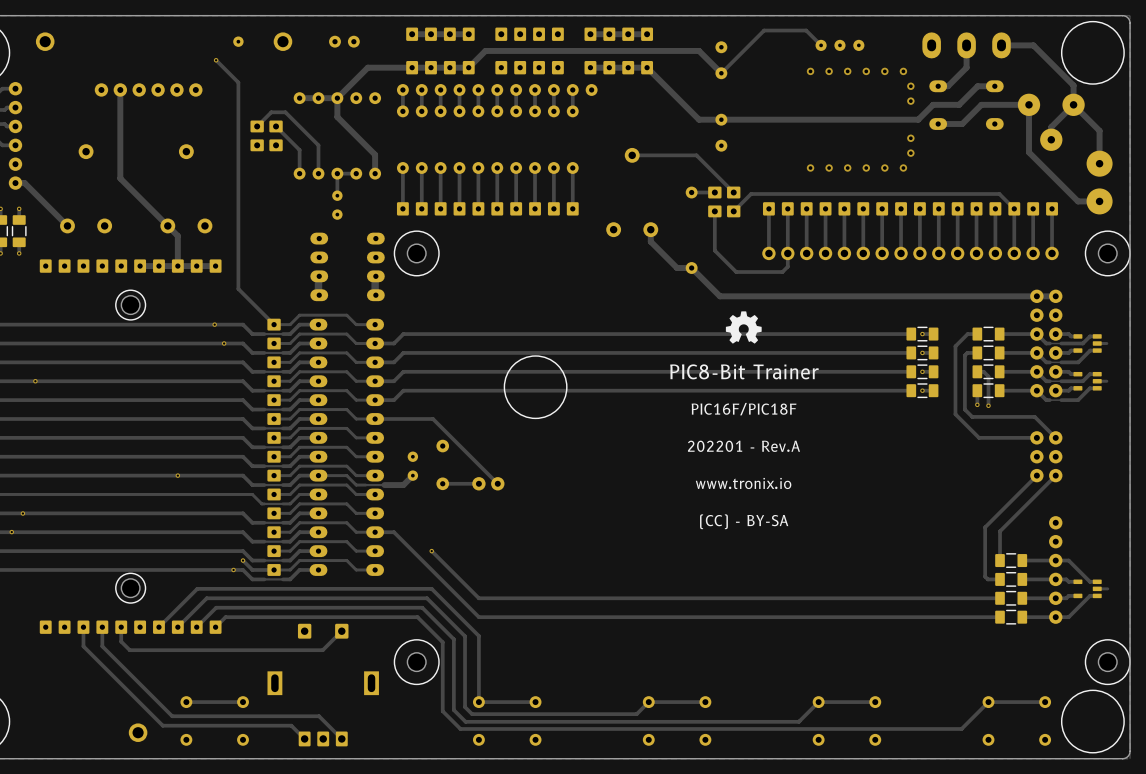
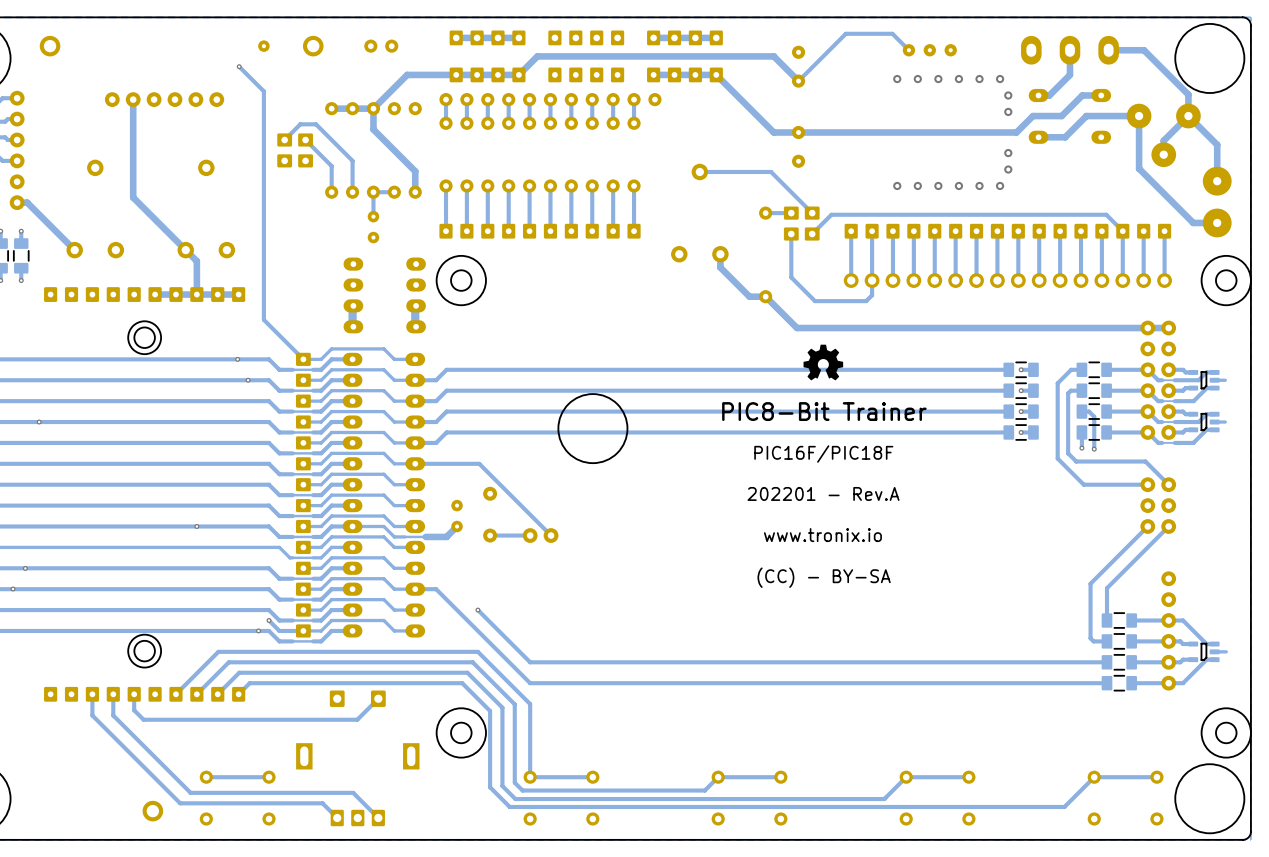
part footprint: [1073, 334, 1102, 353] -> [1188, 369, 1220, 391]
part footprint: [1073, 371, 1102, 391] -> [1188, 411, 1220, 433]
part footprint: [1073, 579, 1102, 599] -> [1188, 641, 1220, 663]

